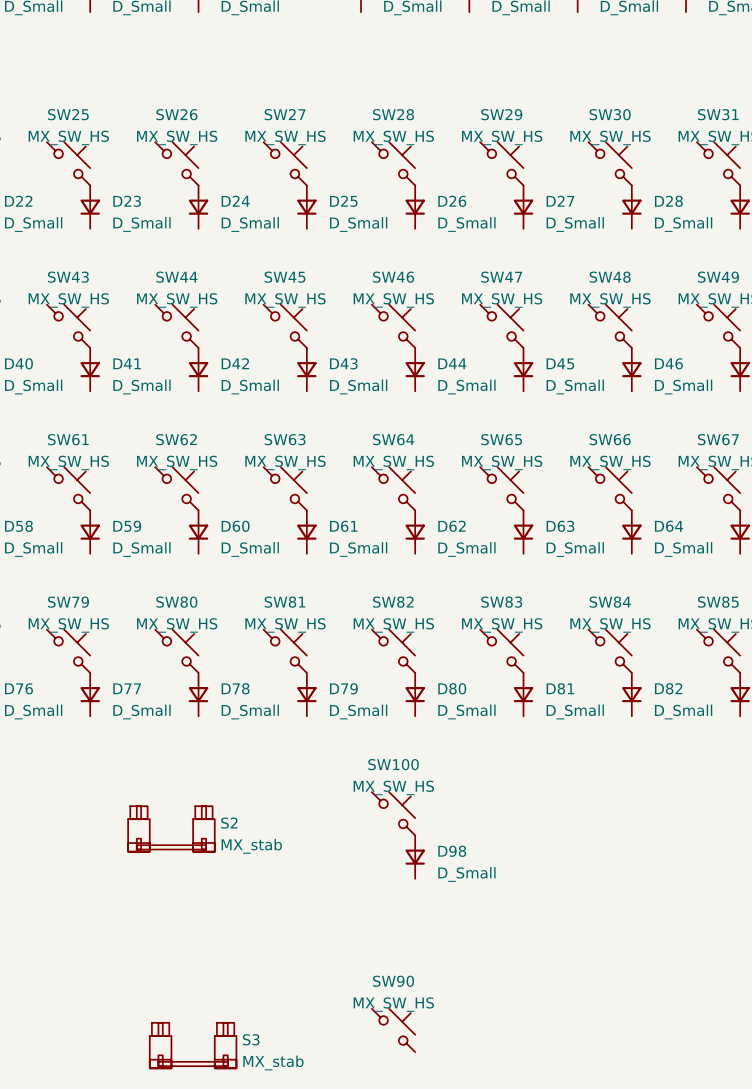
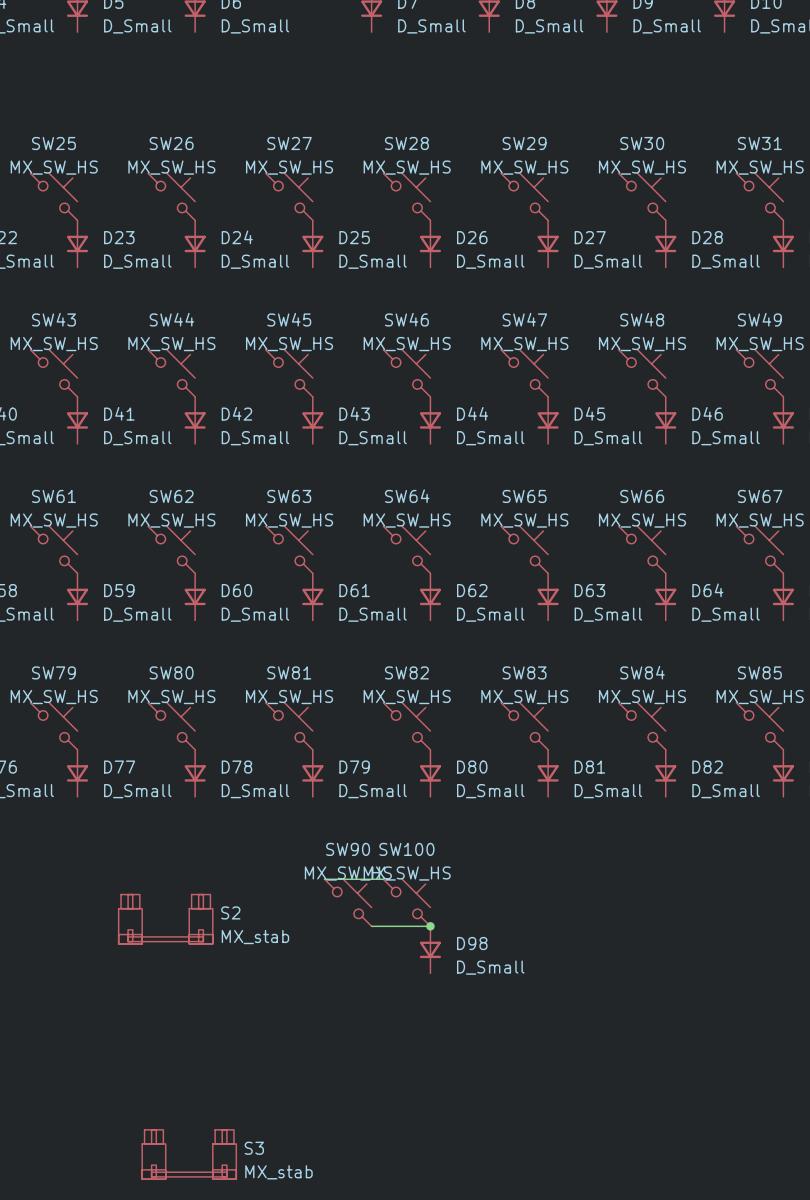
wire: none -> (324, 879) (383, 879)
wire: none -> (371, 926) (430, 926)
junction: none -> (430, 926)
SW90 position: (393, 1030) -> (348, 902)

